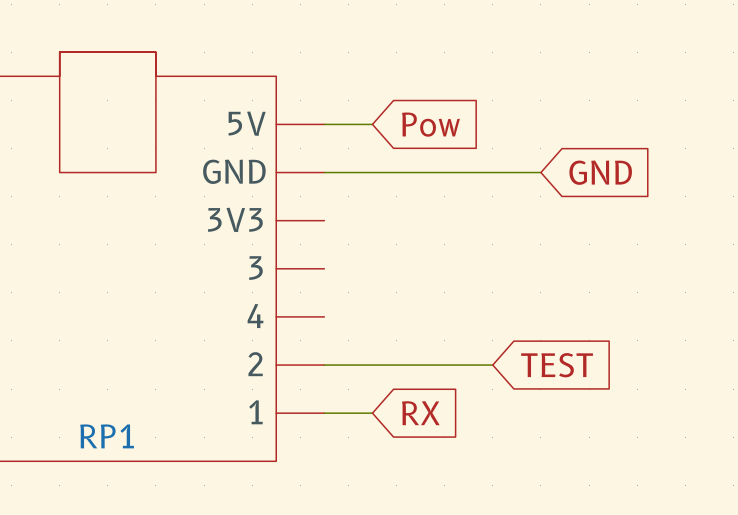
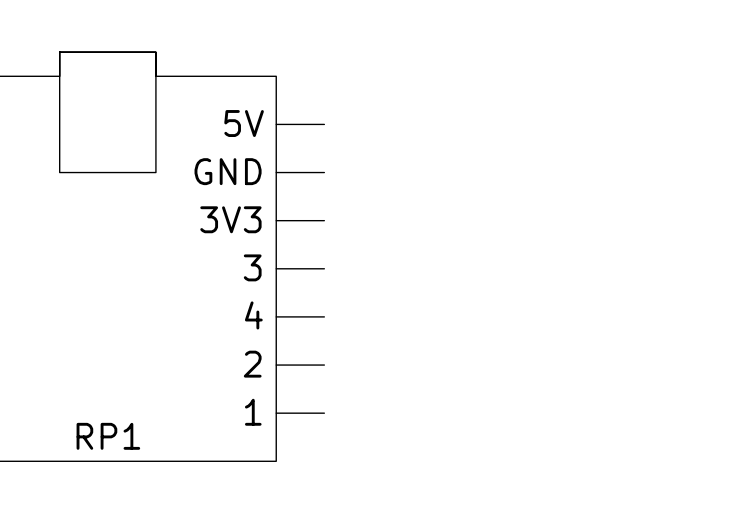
wire: (324, 124) (372, 124) -> none
global label: Pow (430, 124) -> none
wire: (324, 172) (540, 172) -> none
global label: GND (600, 172) -> none
wire: (324, 365) (492, 365) -> none
global label: TEST (557, 365) -> none
wire: (324, 413) (372, 413) -> none
global label: RX (420, 413) -> none

